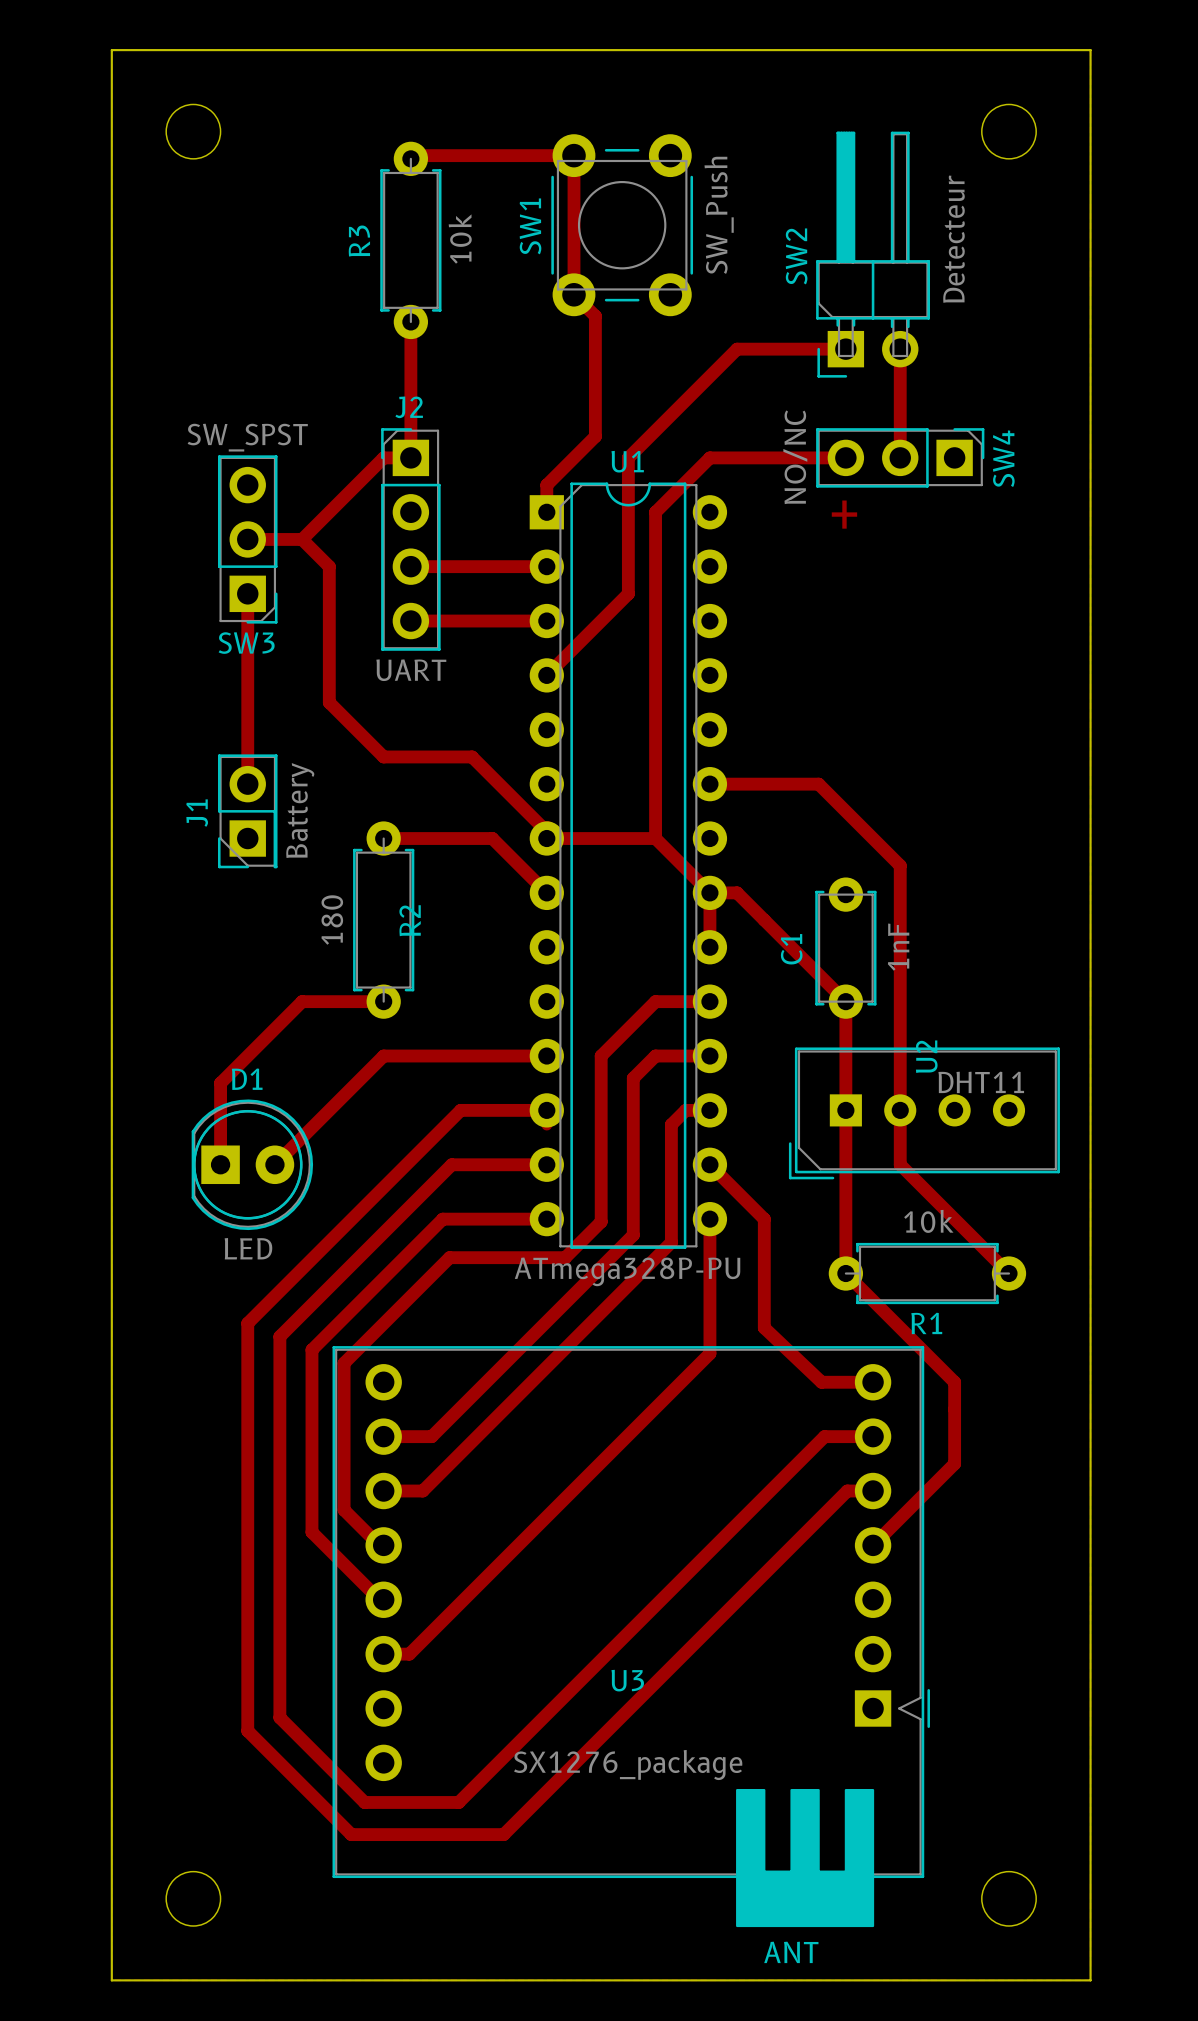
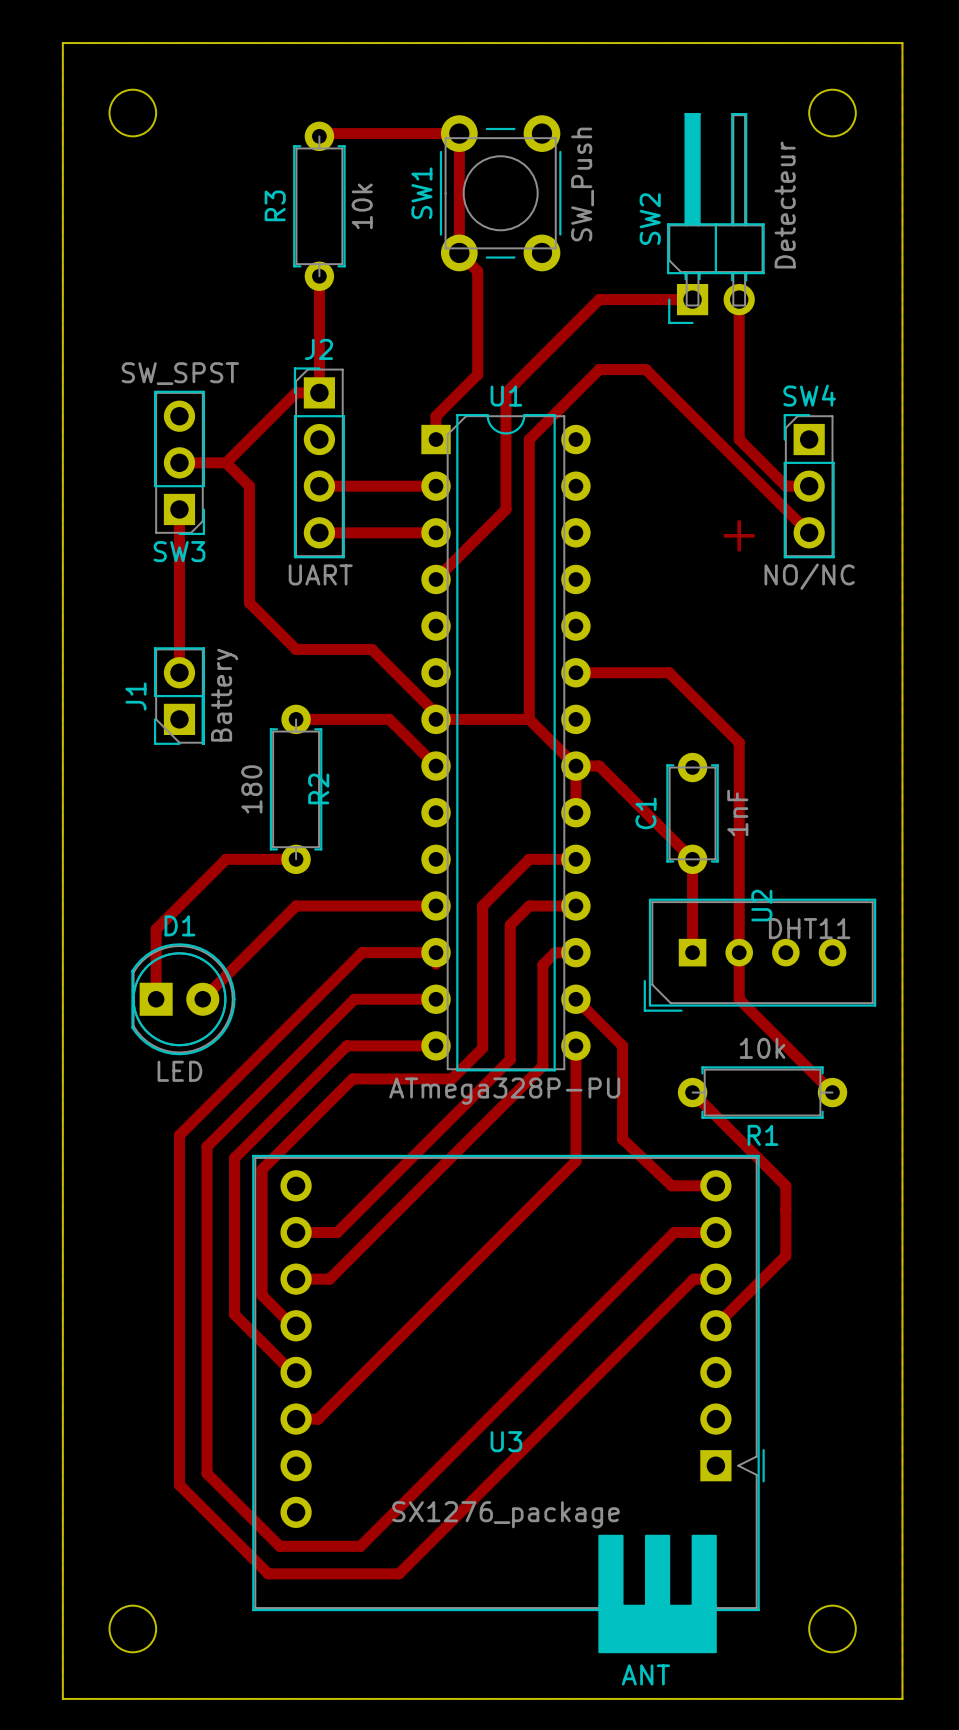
track: (709, 457) (845, 457) -> (575, 392) (599, 369) (645, 369) (809, 532)
track: none -> (739, 392) (739, 439) (785, 486) (809, 486)
SW4 rotation: 0° (900, 457) -> 90° counterclockwise (809, 486)
SW4 position: (900, 457) -> (809, 486)
text position: + (844, 514) -> + (739, 535)
track: (845, 1110) (845, 1273) -> none

